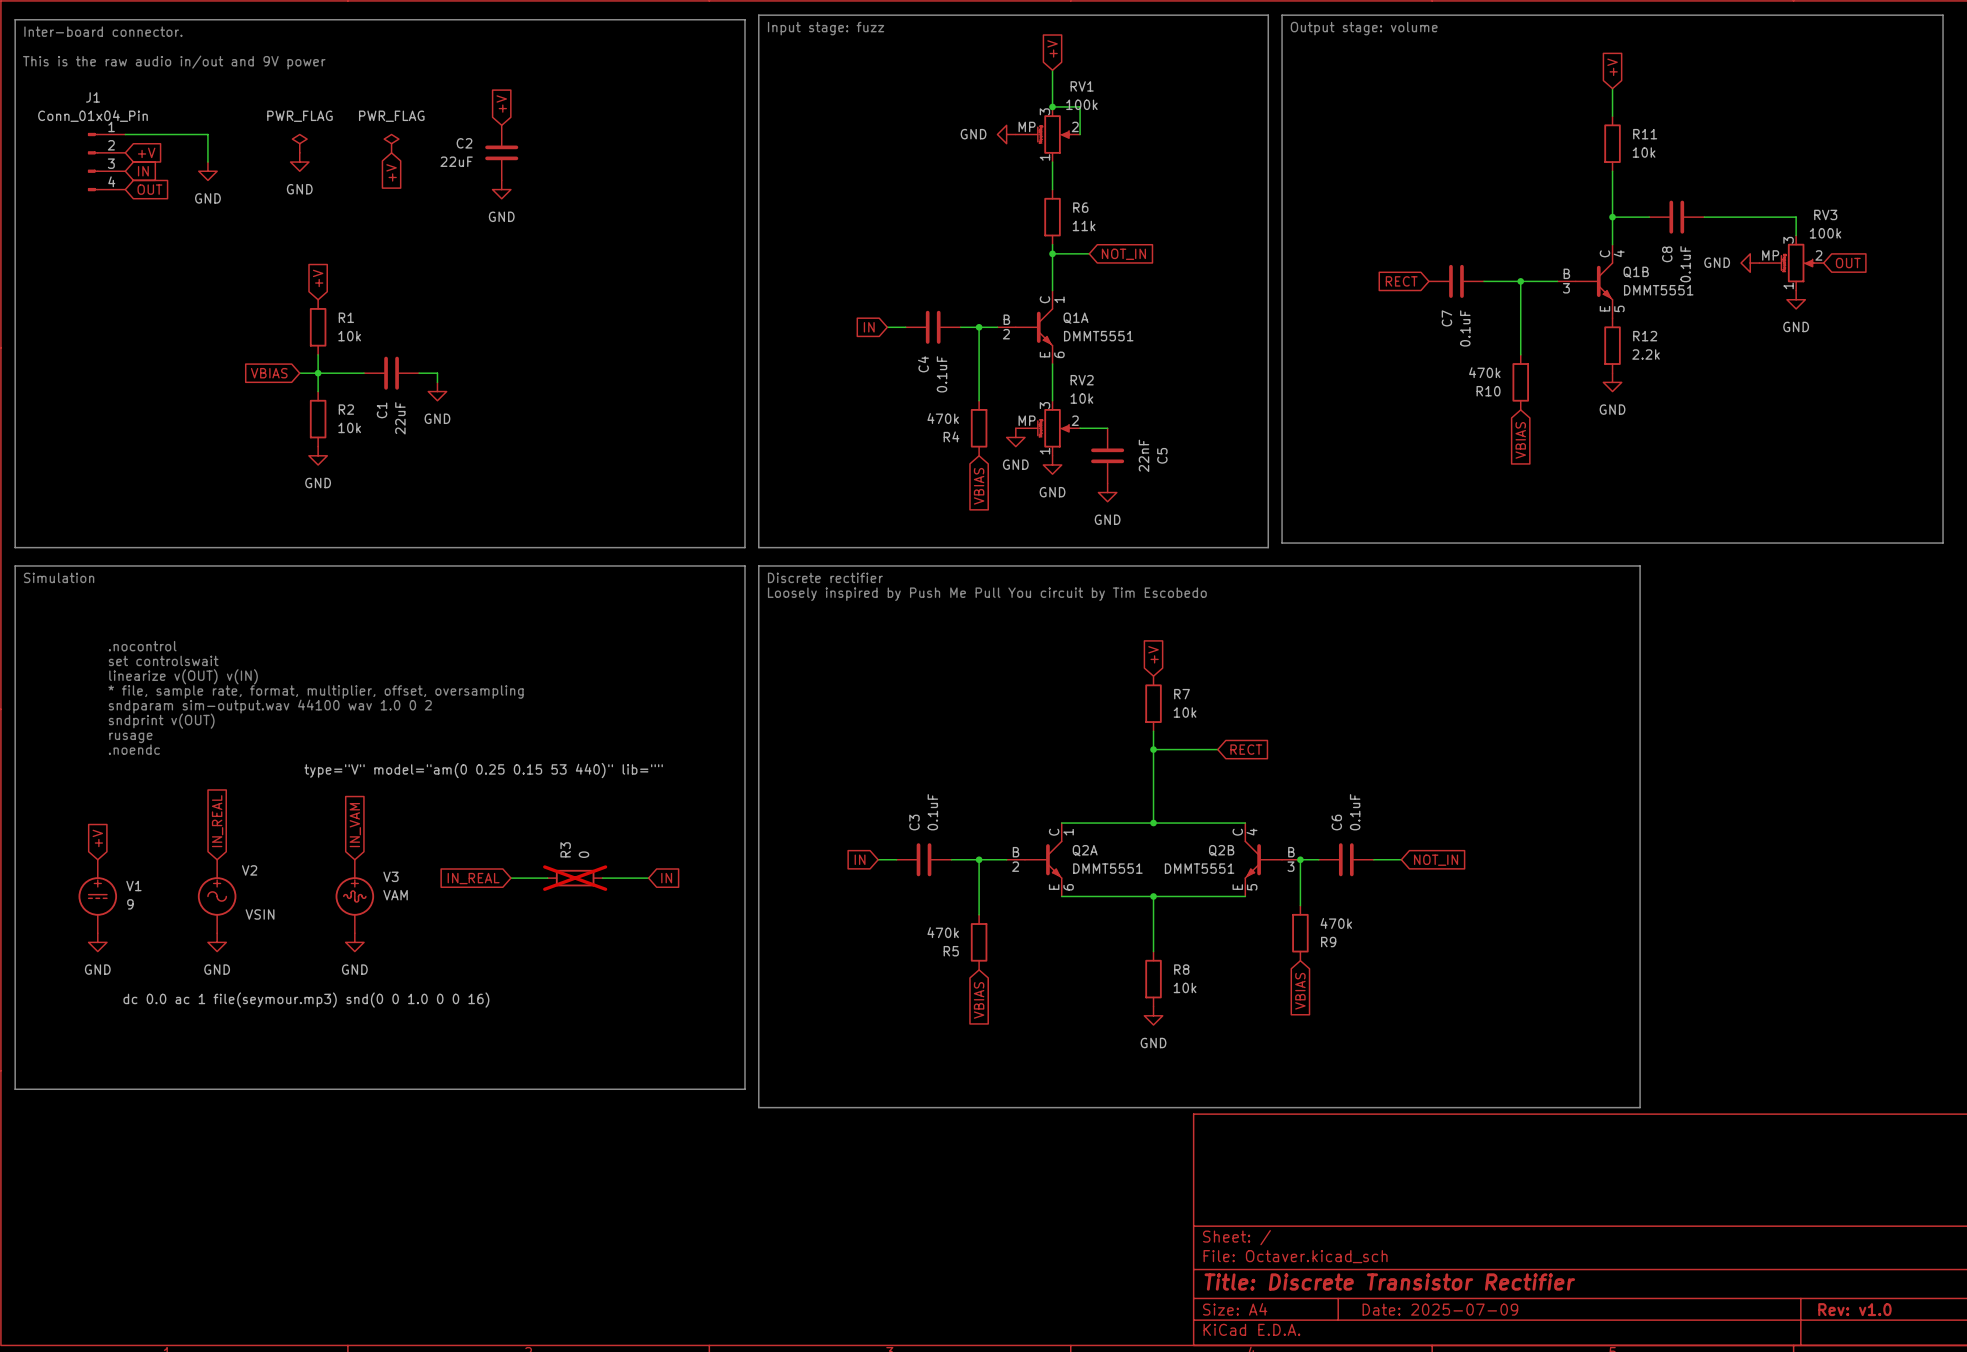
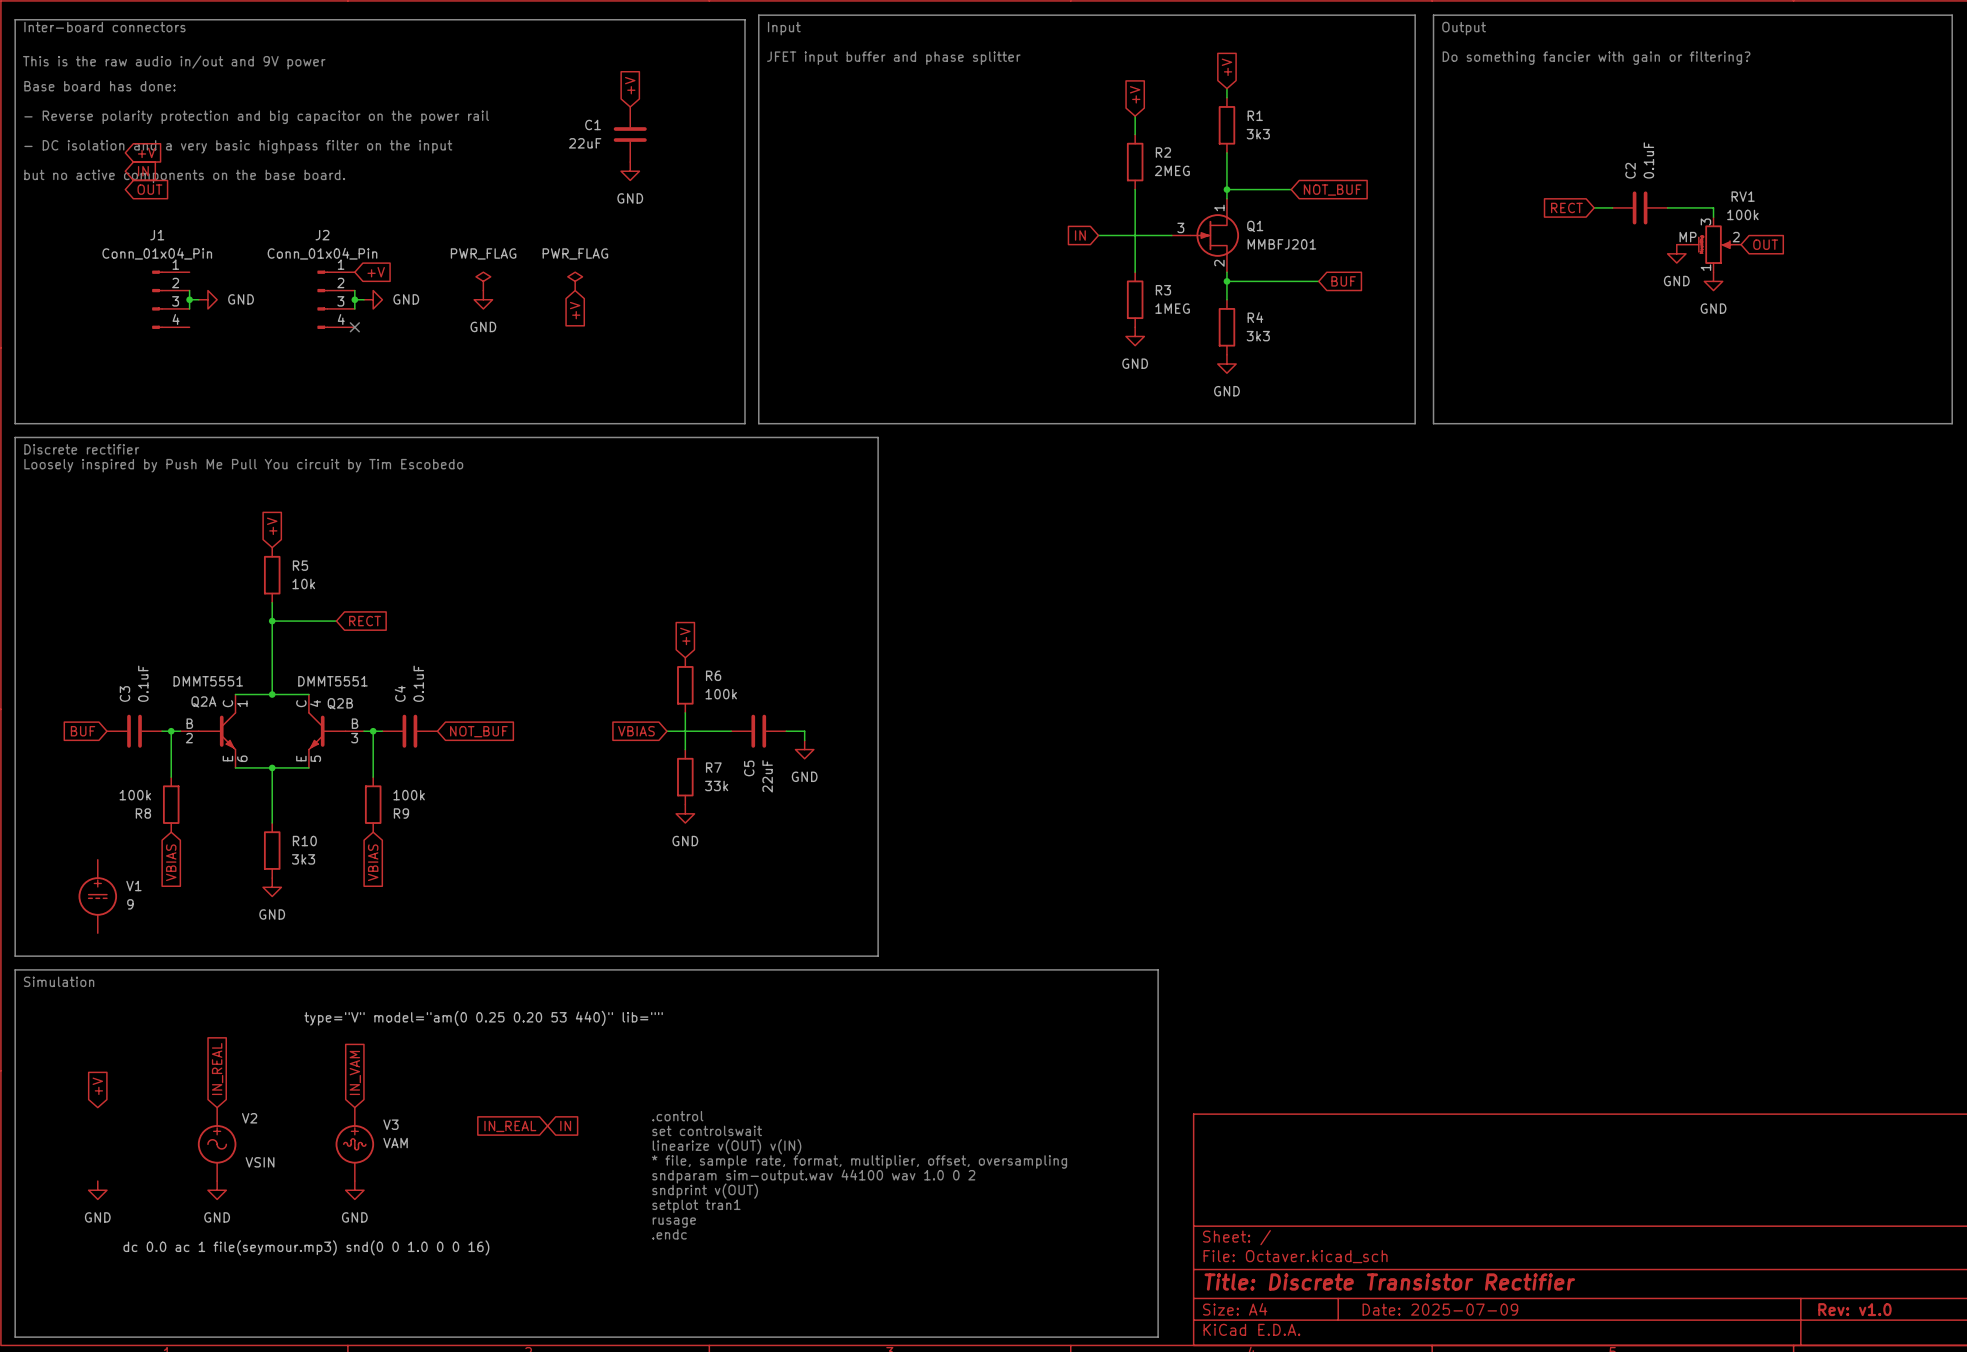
line: (1268, 15) (1268, 547) (758, 547) (758, 423) -> (1415, 15) (1415, 423) (758, 423)
line: none -> (1268, 15) (1282, 15)
line: (1282, 15) (1282, 543) (1943, 543) (1943, 15) -> (1433, 15) (1433, 423) (1952, 423) (1952, 15) (1943, 15)
line: (1415, 15) (1433, 15) -> none
text: Input stage: fuzz (826, 28) -> Input (784, 28)
text: Output stage: volume (1364, 28) -> none
text: none -> Output (1464, 28)
text: Inter-board connector. (103, 31) -> Inter-board connectors (104, 27)
global label: +V (1052, 48) -> none
text: none -> JFET input buffer and phase splitter (893, 58)
text: none -> Do something fancier with gain or filtering? (1596, 58)
global label: none -> +V (1226, 67)
global label: +V (1612, 67) -> none
wire: (1052, 70) (1052, 106) (1080, 106) (1080, 134) -> none
global label: none -> +V (630, 85)
text: none -> Base board has done: (99, 86)
wire: none -> (1226, 88) (1226, 97)
wire: (1612, 88) (1612, 116) -> none
global label: none -> +V (1135, 94)
global label: +V (501, 104) -> none
junction: (1052, 106) -> none
wire: none -> (1135, 116) (1135, 134)
text: none -> - Reverse polarity protection and big capacitor on the power rail (256, 117)
wire: (125, 134) (207, 134) (207, 162) -> none
power symbol: GND (1006, 134) -> none
RV1 position: (1047, 134) -> (1708, 244)
power symbol: PWR_FLAG (299, 143) -> none
power symbol: PWR_FLAG (391, 143) -> none
C2 name position: C2 (464, 143) -> C2 (1630, 170)
R11: 10k (1612, 143) -> none
text: none -> - DC isolation and a very basic highpass filter on the input (238, 146)
C2 rotation: 0° (501, 152) -> 90° clockwise (1640, 207)
C2 position: (501, 152) -> (1640, 207)
wire: none -> (1226, 152) (1226, 198)
C2 value: 22uF (456, 161) -> 0.1uF (1648, 160)
J1 position: (106, 162) -> (170, 299)
power symbol: GND (299, 162) -> none
wire: (1052, 162) (1052, 189) -> none
power symbol: GND (207, 171) -> none
power symbol: none -> GND (630, 171)
wire: (1612, 171) (1612, 244) -> none
global label: +V (391, 172) -> none
text: none -> but no active components on the base board. (184, 176)
power symbol: GND (501, 189) -> none
wire: none -> (1135, 189) (1135, 272)
wire: none -> (1226, 189) (1291, 189)
junction: none -> (1226, 189)
global label: none -> NOT_BUF (1332, 190)
global label: none -> RECT (1566, 207)
wire: none -> (1594, 207) (1612, 207)
wire: none -> (1667, 207) (1713, 207) (1713, 217)
R6 position: (1052, 217) -> (685, 685)
wire: (1612, 217) (1649, 217) -> none
junction: (1612, 217) -> none
C8: 0.1uF (1676, 217) -> none
wire: (1704, 217) (1796, 217) (1796, 235) -> none
R6 value: 11k (1084, 225) -> 100k (721, 694)
global label: none -> IN (1080, 235)
wire: none -> (1098, 235) (1171, 235)
Q1: none -> MMBFJ201 (1205, 235)
wire: (1052, 244) (1052, 290) -> none
wire: (1052, 253) (1089, 253) -> none
junction: (1052, 253) -> none
power symbol: none -> GND (1676, 253)
global label: NOT_IN (1123, 254) -> none
power symbol: GND (1750, 263) -> none
RV3: 100k (1791, 263) -> none
global label position: OUT (1848, 263) -> OUT (1765, 244)
wire: none -> (1226, 272) (1226, 299)
global label rotation: 0° (318, 278) -> 90° clockwise (376, 272)
global label position: +V (318, 278) -> +V (376, 272)
power symbol: none -> PWR_FLAG (483, 281)
power symbol: none -> PWR_FLAG (575, 281)
wire: none -> (1226, 281) (1318, 281)
junction: none -> (1226, 281)
global label: none -> BUF (1343, 281)
global label: RECT (1401, 281) -> none
C7: 0.1uF (1456, 281) -> none
wire: (1484, 281) (1557, 281) -> none
wire: (1520, 281) (1520, 354) -> none
junction: (1520, 281) -> none
Q1B: DMMT5551 (1584, 281) -> none
power symbol: none -> GND (1713, 281)
wire: none -> (189, 290) (189, 308)
wire: none -> (354, 290) (354, 308)
wire: none -> (189, 299) (198, 299)
junction: none -> (189, 299)
power symbol: none -> GND (207, 299)
J2: none -> Conn_01x04_Pin (336, 299)
wire: none -> (354, 299) (364, 299)
junction: none -> (354, 299)
power symbol: none -> GND (373, 299)
power symbol: none -> GND (483, 299)
power symbol: GND (1796, 299) -> none
global label: none -> +V (575, 310)
R1 position: (318, 327) -> (1226, 125)
no-connect mark: none -> (354, 327)
global label: IN (869, 327) -> none
wire: (887, 327) (905, 327) -> none
C4 position: (933, 327) -> (409, 731)
wire: (960, 327) (997, 327) -> none
wire: (979, 327) (979, 400) -> none
junction: (979, 327) -> none
Q1A: DMMT5551 (1024, 327) -> none
R1 value: 10k (349, 336) -> 3k3 (1258, 134)
power symbol: none -> GND (1135, 336)
R12: 2.2k (1612, 345) -> none
wire: (318, 354) (318, 391) -> none
C4 name position: C4 (923, 364) -> C4 (400, 693)
wire: (1052, 364) (1052, 400) -> none
power symbol: none -> GND (1226, 364)
R10 value: 470k (1484, 372) -> 3k3 (303, 859)
global label: VBIAS (269, 373) -> none
wire: (299, 373) (364, 373) -> none
junction: (318, 373) -> none
C1 rotation: 0° (391, 373) -> 90° clockwise (630, 134)
C1 position: (391, 373) -> (630, 134)
wire: (419, 373) (437, 373) (437, 382) -> none
C4 value position: 0.1uF (942, 374) -> 0.1uF (418, 683)
R10 position: (1520, 382) -> (272, 850)
power symbol: GND (1612, 382) -> none
power symbol: GND (437, 391) -> none
R10 name position: R10 (1488, 391) -> R10 (304, 841)
R4 value: 470k (943, 418) -> 3k3 (1258, 336)
R2 position: (318, 419) -> (1135, 162)
line: (15, 423) (15, 437) -> (15, 956) (878, 956) (878, 437) (15, 437)
line: (745, 423) (745, 547) (15, 547) -> (745, 423) (15, 423)
R2 value: 10k (349, 427) -> 2MEG (1172, 170)
R4 position: (979, 428) -> (1226, 327)
RV2: 10k (1047, 428) -> none
wire: (1080, 428) (1107, 428) -> none
R4 name position: R4 (951, 436) -> R4 (1255, 317)
power symbol: GND (1015, 437) -> none
global label: VBIAS (1520, 440) -> none
text: none -> Discrete rectifier (81, 449)
power symbol: GND (318, 455) -> none
C5 rotation: 0° (1107, 455) -> 90° clockwise (758, 731)
C5 position: (1107, 455) -> (758, 731)
C5 value: 22nF (1143, 455) -> 22uF (767, 776)
C5 name position: C5 (1162, 455) -> C5 (749, 768)
text: none -> Loosely inspired by Push Me Pull You circuit by Tim Escobedo (243, 465)
power symbol: GND (1052, 465) -> none
global label: VBIAS (979, 486) -> none
power symbol: GND (1107, 492) -> none
global label: none -> +V (272, 526)
line: (15, 565) (745, 565) (745, 1089) (15, 1089) -> (15, 565) (15, 547)
line: (758, 565) (1640, 565) (1640, 1107) (758, 1107) (758, 565) -> none
text: Simulation (59, 577) -> none
text: Discrete rectifier (825, 577) -> none
text: Loosely inspired by Push Me Pull You circuit by Tim Escobedo (987, 594) -> none
wire: none -> (272, 602) (272, 694)
wire: none -> (272, 621) (336, 621)
junction: none -> (272, 621)
global label: none -> RECT (365, 621)
global label: none -> +V (685, 636)
text: .nocontrol (142, 646) -> none
global label: +V (1153, 654) -> none
text: set controlswait (163, 660) -> none
text: linearize v(OUT) v(IN) (183, 676) -> none
text: * file, sample rate, format, multiplier, offset, oversampling (316, 692) -> none
wire: none -> (235, 694) (308, 694)
junction: none -> (272, 694)
R7 position: (1153, 703) -> (685, 777)
text: sndparam sim-output.wav 44100 wav 1.0 0 2 (270, 706) -> none
wire: none -> (685, 712) (685, 749)
R7 value: 10k (1185, 712) -> 33k (716, 785)
text: sndprint v(OUT) (161, 721) -> none
global label: none -> BUF (83, 731)
wire: none -> (162, 731) (180, 731)
wire: none -> (171, 731) (171, 777)
junction: none -> (171, 731)
wire: none -> (364, 731) (382, 731)
wire: none -> (373, 731) (373, 777)
junction: none -> (373, 731)
global label: none -> NOT_BUF (478, 731)
global label: none -> VBIAS (636, 731)
wire: none -> (666, 731) (731, 731)
wire: none -> (786, 731) (804, 731) (804, 740)
wire: (1153, 731) (1153, 823) -> none
text: rusage (130, 737) -> none
text: .noendc (134, 749) -> none
power symbol: none -> GND (804, 749)
wire: (1153, 749) (1217, 749) -> none
junction: (1153, 749) -> none
global label: RECT (1246, 749) -> none
wire: none -> (235, 767) (308, 767)
wire: none -> (272, 767) (272, 823)
junction: none -> (272, 767)
V3 text: type="V" model="am(0 0.25 0.15 53 440)" lib="" (483, 770) -> type="V" model="am(0 0.25 0.20 53 440)" lib="" (483, 1018)
power symbol: none -> GND (685, 813)
global label: IN_REAL (217, 821) -> none
wire: (1061, 823) (1245, 823) -> none
junction: (1153, 823) -> none
global label: IN_VAM (355, 825) -> none
global label: +V (97, 838) -> none
Q2A name position: Q2A (1085, 850) -> Q2A (203, 701)
Q2B name position: Q2B (1221, 850) -> Q2B (340, 703)
R3 value: 0 (584, 854) -> 1MEG (1172, 308)
global label: IN (860, 859) -> none
wire: (878, 859) (896, 859) -> none
C3 position: (924, 859) -> (134, 731)
wire: (951, 859) (1006, 859) -> none
wire: (979, 859) (979, 914) -> none
junction: (979, 859) -> none
Q2A position: (1034, 859) -> (207, 731)
Q2B position: (1272, 859) -> (336, 731)
junction: (1300, 859) -> none
wire: (1318, 859) (1300, 859) (1300, 905) -> none
C6: 0.1uF (1346, 859) -> none
wire: (1373, 859) (1401, 859) -> none
global label: NOT_IN (1436, 860) -> none
global label: none -> VBIAS (171, 862)
global label: none -> VBIAS (373, 862)
Q2A value position: DMMT5551 (1107, 868) -> DMMT5551 (208, 681)
Q2B value position: DMMT5551 (1199, 868) -> DMMT5551 (332, 681)
global label: IN_REAL (473, 878) -> none
wire: (510, 878) (547, 878) -> none
R3 rotation: 0° (575, 878) -> 90° clockwise (1135, 299)
R3 position: (575, 878) -> (1135, 299)
R3 do-not-place cross: (575, 878) -> none
wire: (602, 878) (648, 878) -> none
global label: IN (666, 878) -> none
power symbol: none -> GND (272, 887)
V2 position: (217, 896) -> (217, 1144)
V3 position: (354, 896) -> (354, 1144)
wire: (1061, 896) (1245, 896) -> none
wire: (1153, 896) (1153, 951) -> none
junction: (1153, 896) -> none
R9 value: 470k (1336, 923) -> 100k (409, 795)
R5 value: 470k (943, 932) -> 10k (303, 584)
R9 position: (1300, 933) -> (373, 804)
power symbol: GND (97, 942) -> none
power symbol: GND (217, 942) -> none
power symbol: GND (354, 942) -> none
R5 position: (979, 942) -> (272, 575)
R5 name position: R5 (951, 951) -> R5 (300, 565)
line: (15, 956) (15, 969) -> (15, 1089) (15, 1337) (1158, 1337) (1158, 969) (15, 969)
R8 name position: R8 (1181, 969) -> R8 (143, 813)
R8 position: (1153, 979) -> (171, 804)
text: none -> Simulation (59, 981)
R8 value: 10k (1185, 987) -> 100k (135, 795)
global label: VBIAS (1300, 991) -> none
global label: VBIAS (979, 1000) -> none
power symbol: GND (1153, 1015) -> none
global label: none -> IN_REAL (217, 1069)
global label: none -> IN_VAM (355, 1072)
global label: none -> +V (97, 1086)
text: none -> .control (677, 1116)
global label: none -> IN (565, 1125)
global label: none -> IN_REAL (510, 1126)
text: none -> set controlswait (707, 1130)
text: none -> linearize v(OUT) v(IN) (727, 1146)
text: none -> * file, sample rate, format, multiplier, offset, oversampling (859, 1161)
text: none -> sndparam sim-output.wav 44100 wav 1.0 0 2 (813, 1176)
power symbol: none -> GND (97, 1190)
power symbol: none -> GND (217, 1190)
power symbol: none -> GND (354, 1190)
text: none -> sndprint v(OUT) (705, 1191)
text: none -> setplot tran1 (696, 1206)
text: none -> rusage (674, 1222)
text: none -> .endc (669, 1234)

